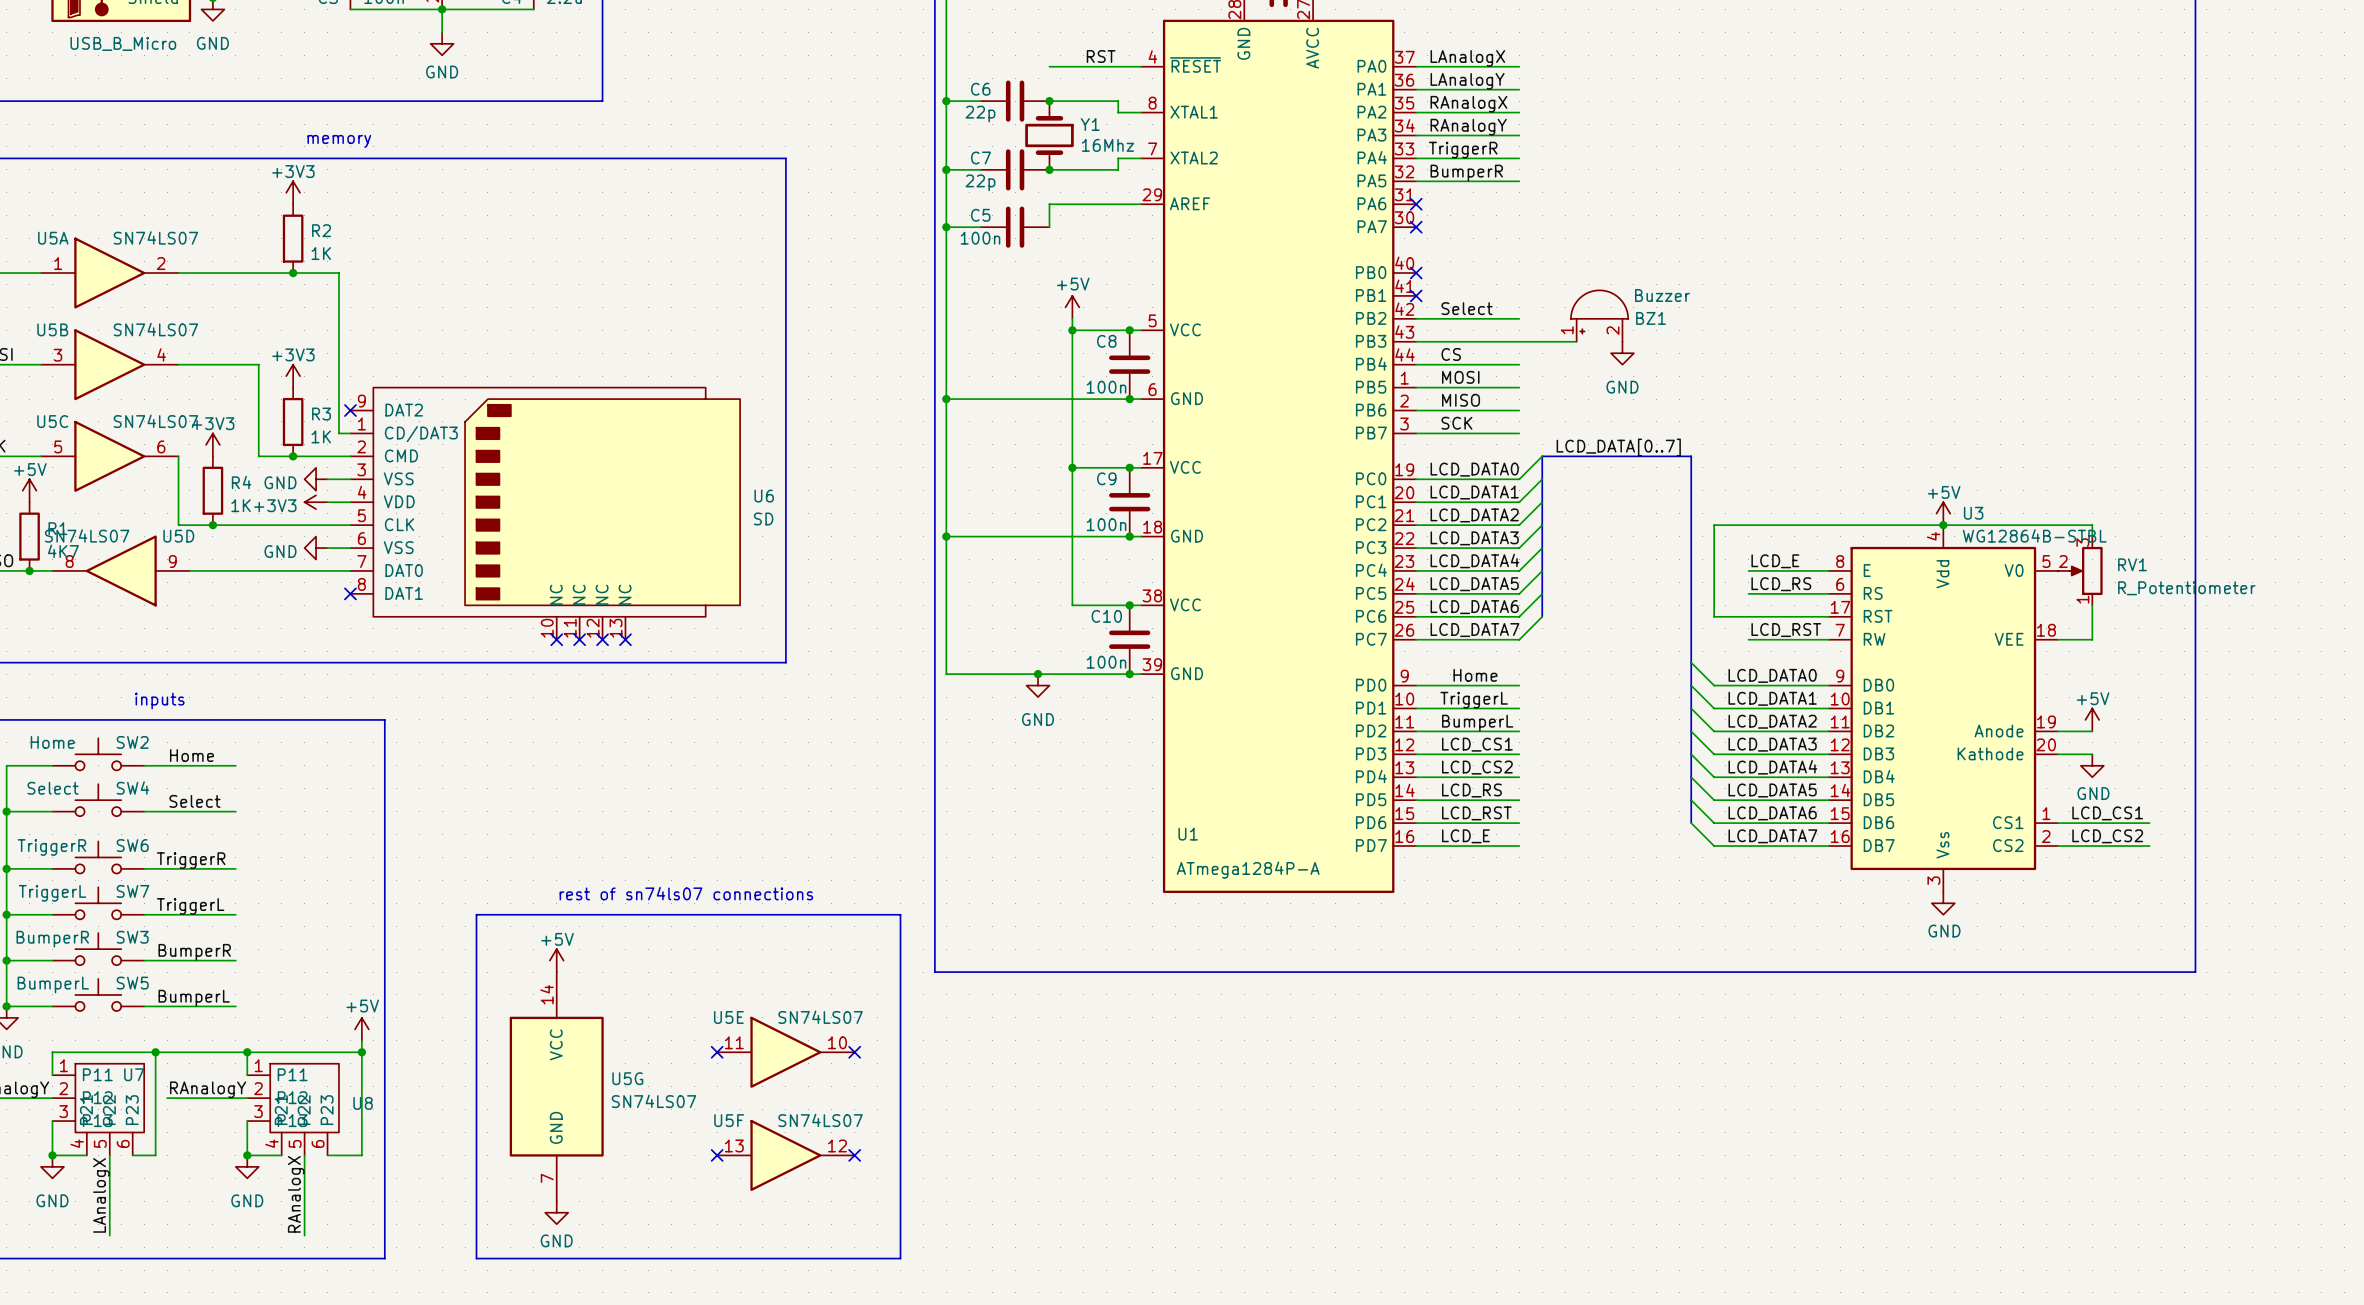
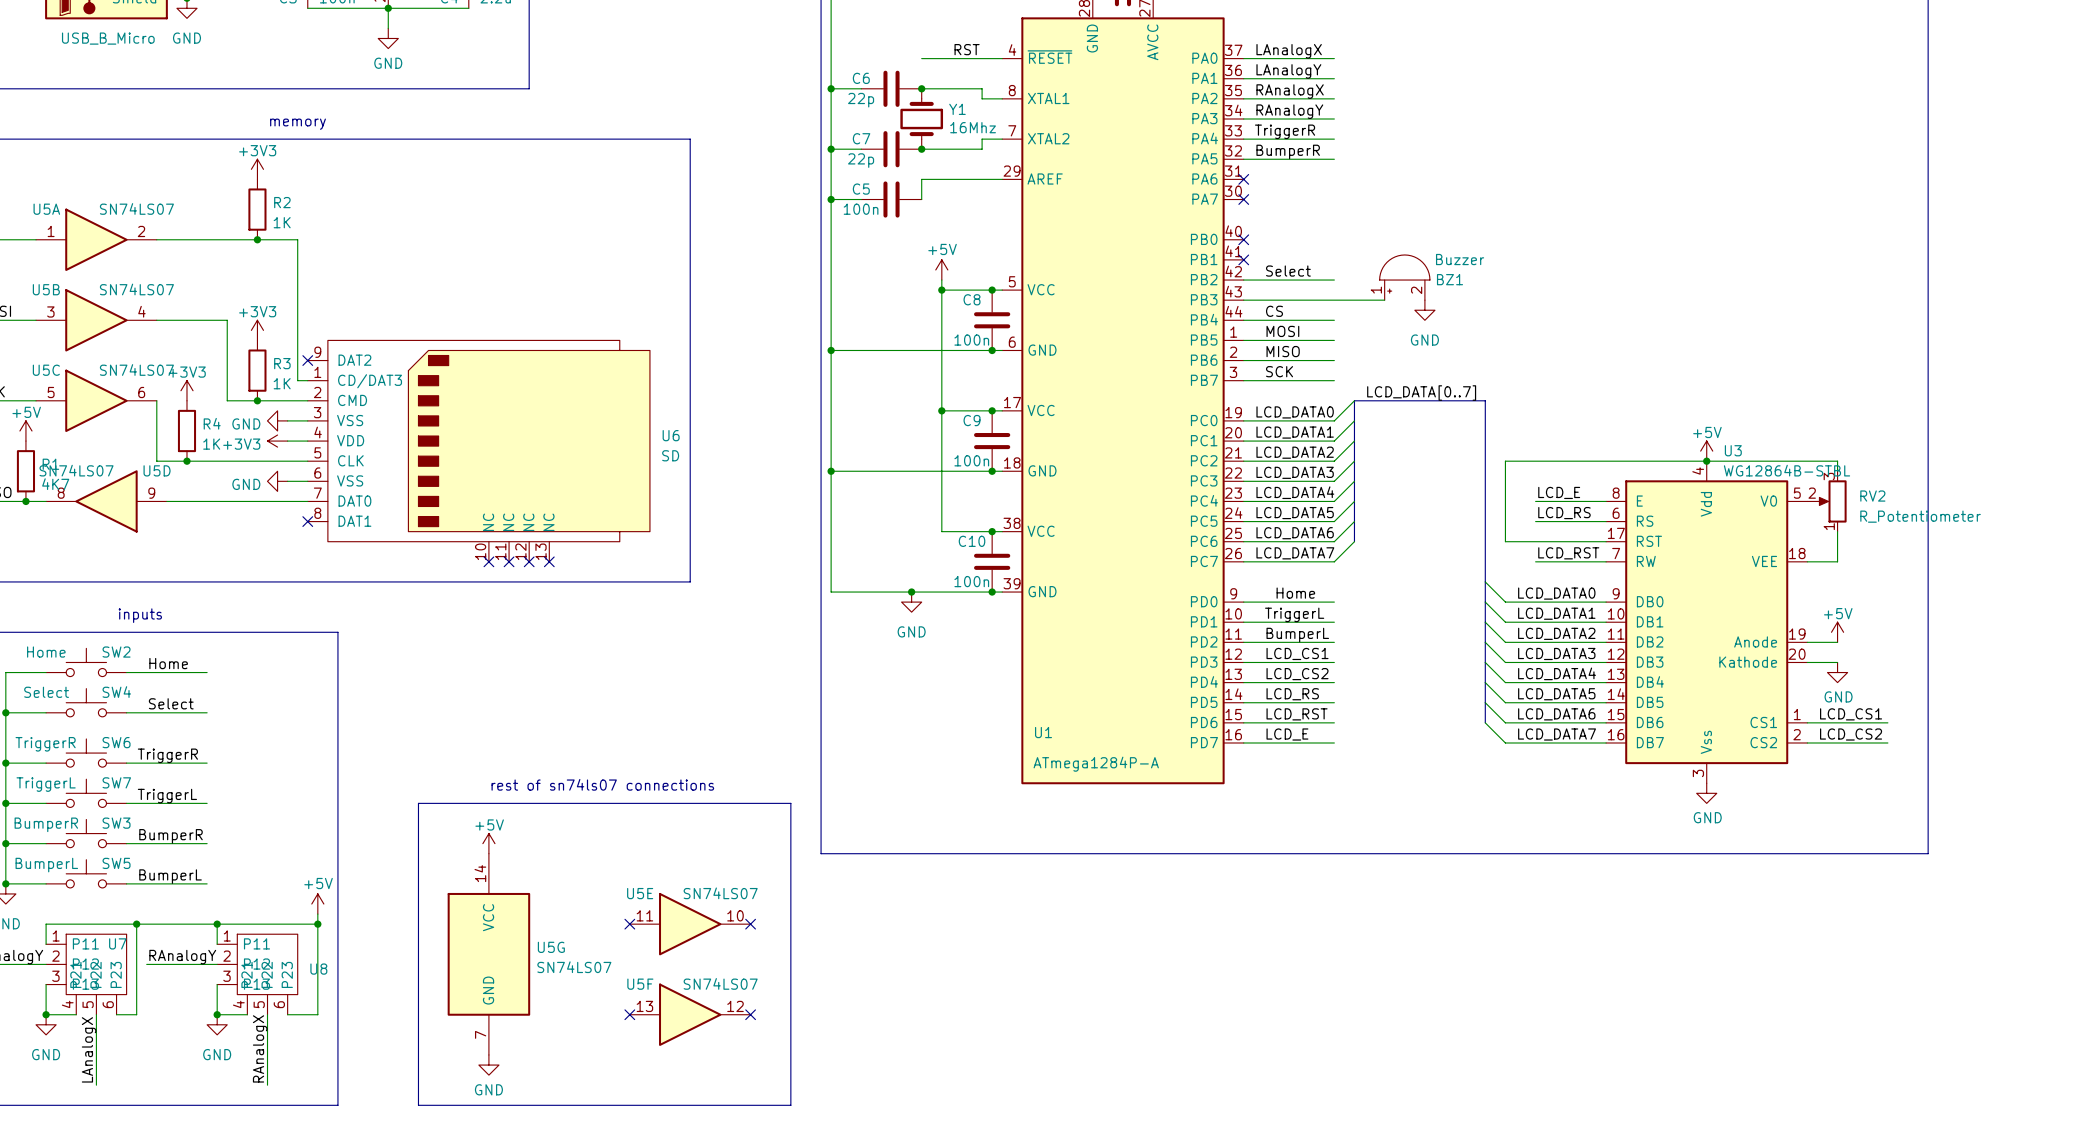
RV1 name: RV1 (2132, 564) -> RV2 (1872, 496)

